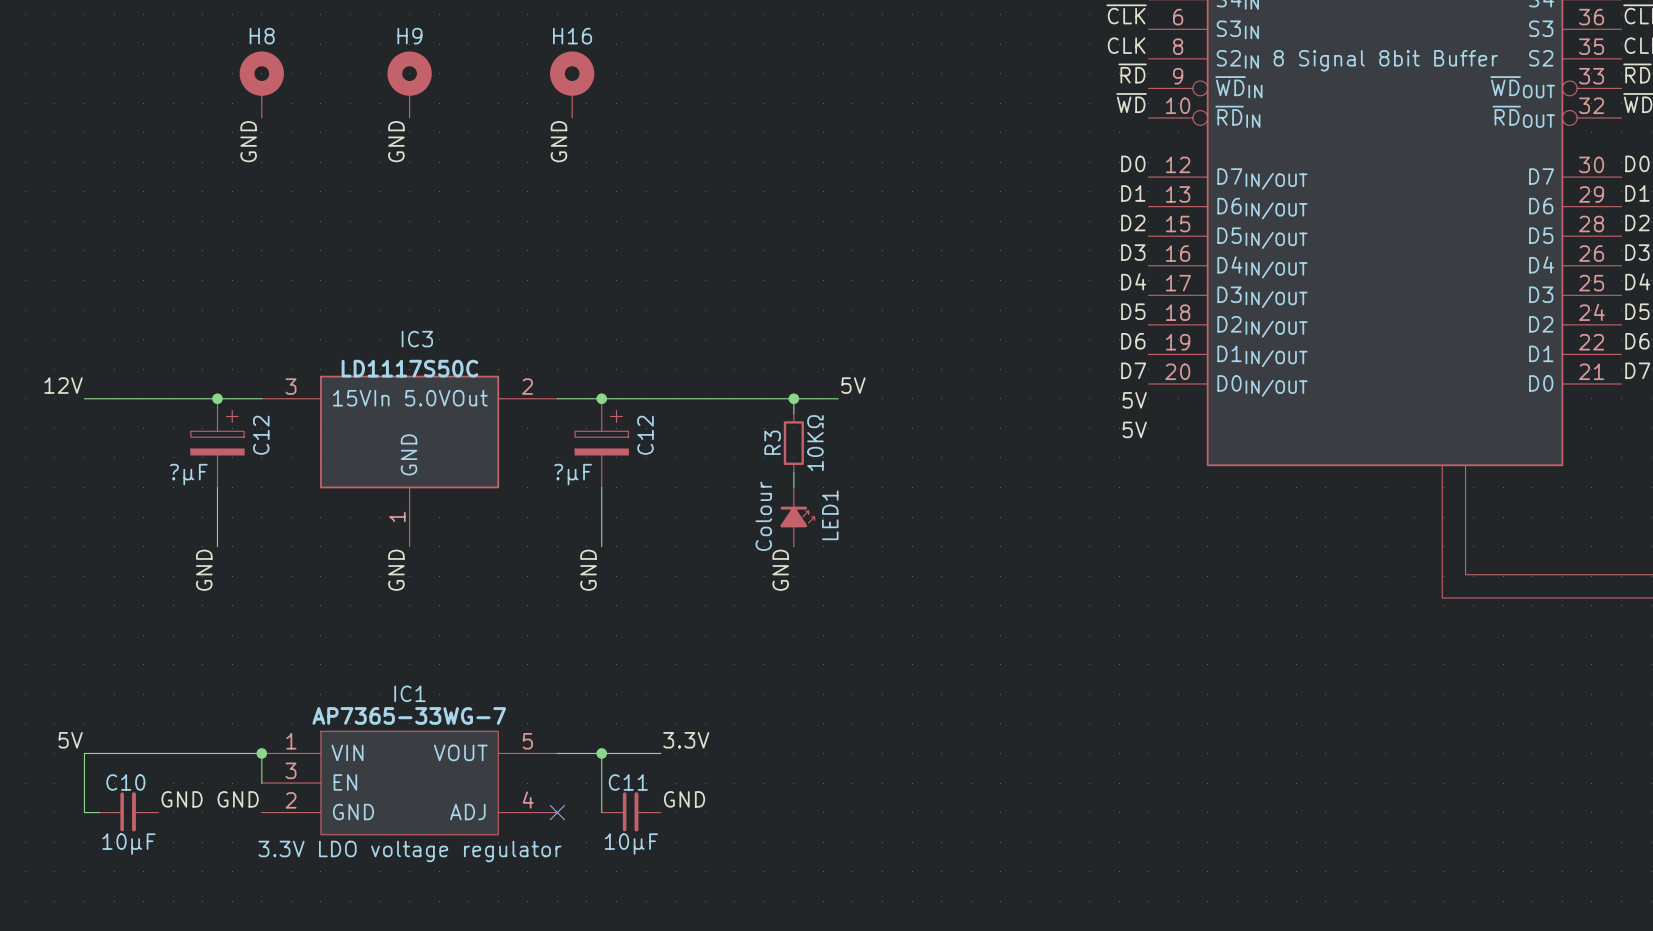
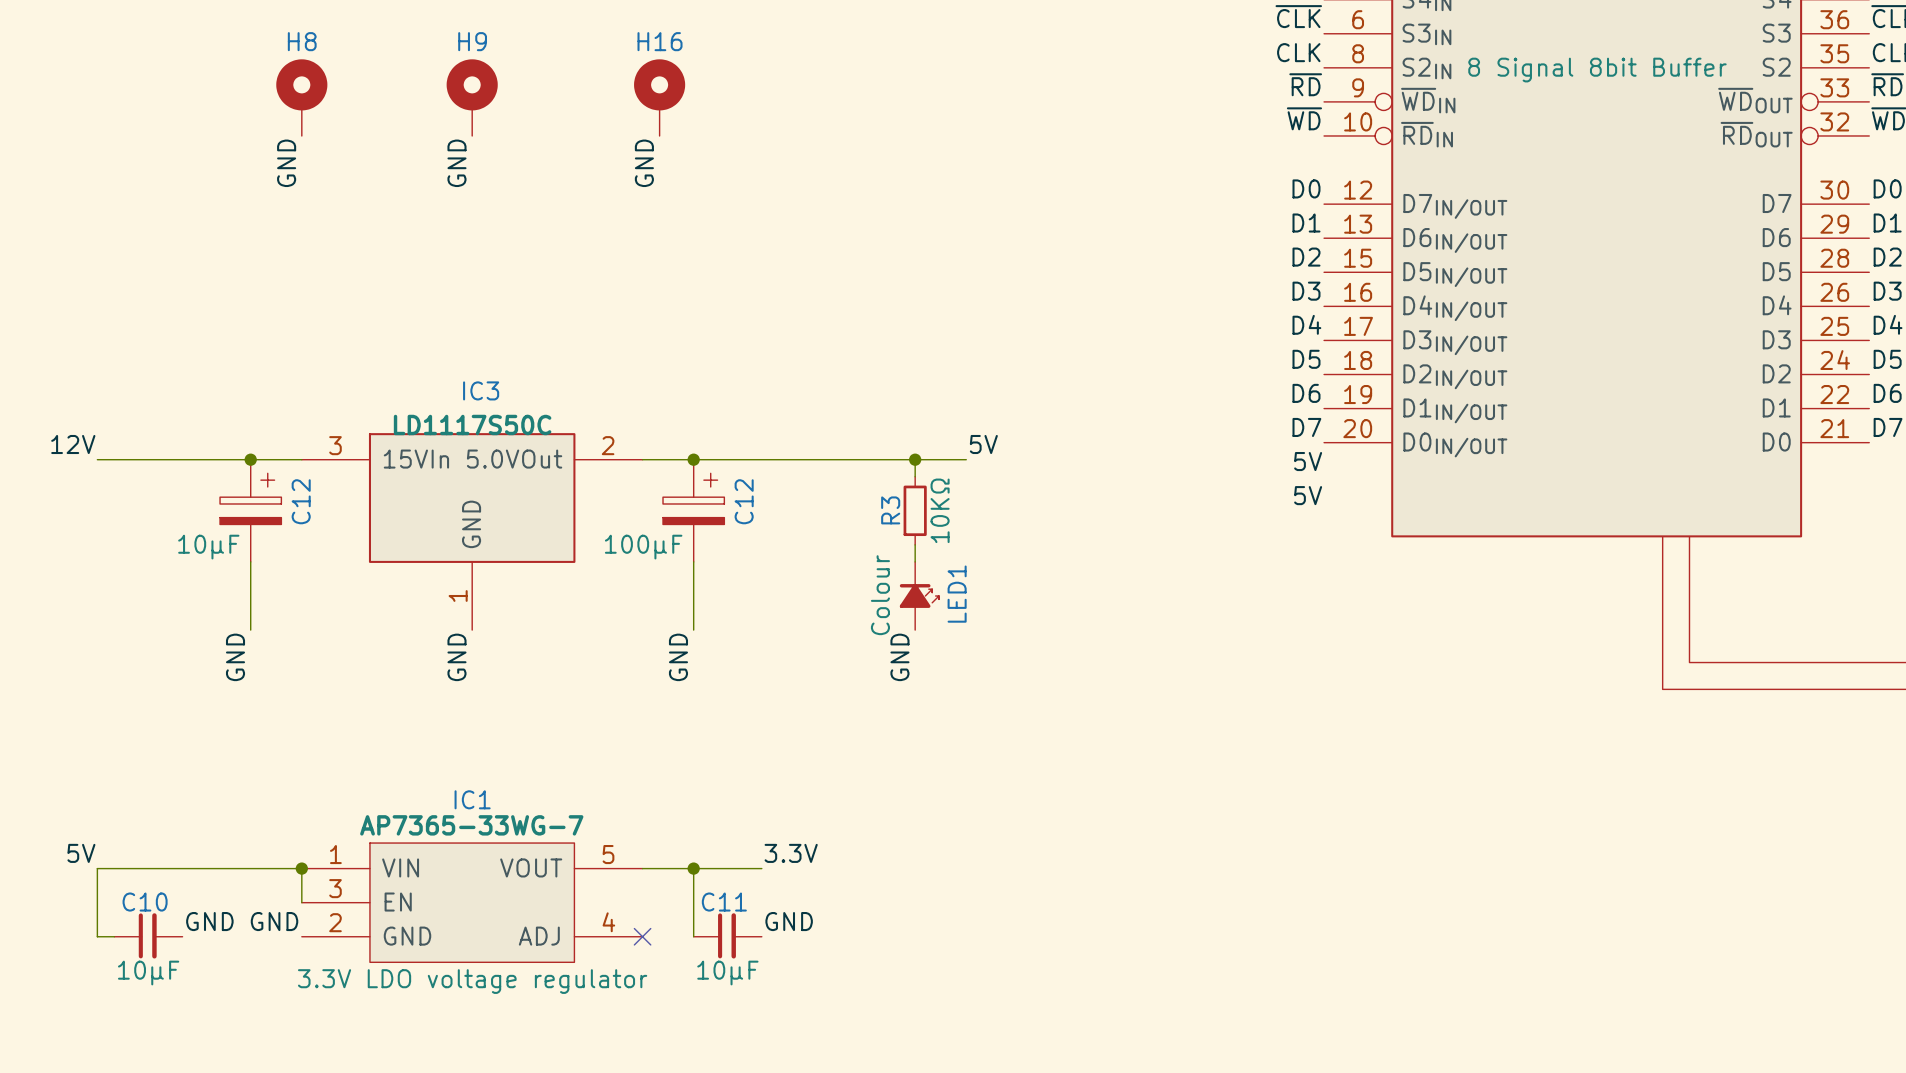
C12 text: ?μF (188, 474) -> 10μF (208, 547)
C12 text: ?μF (573, 474) -> 100μF (643, 547)

